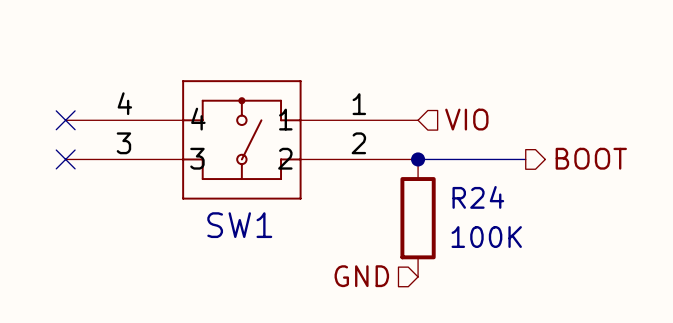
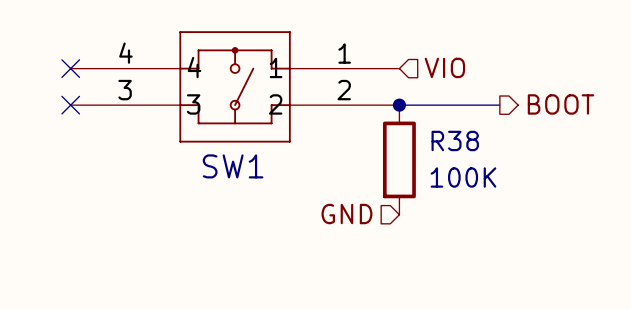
R24 name: R24 (478, 197) -> R38 (455, 140)

